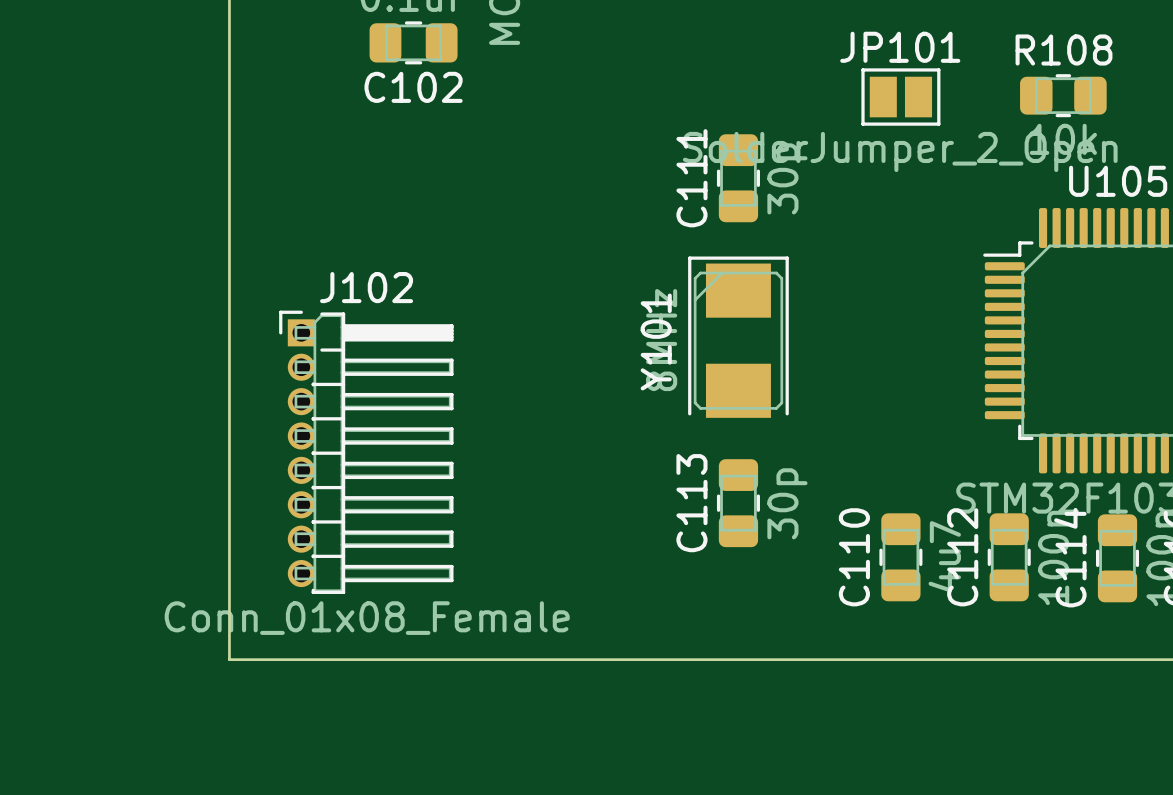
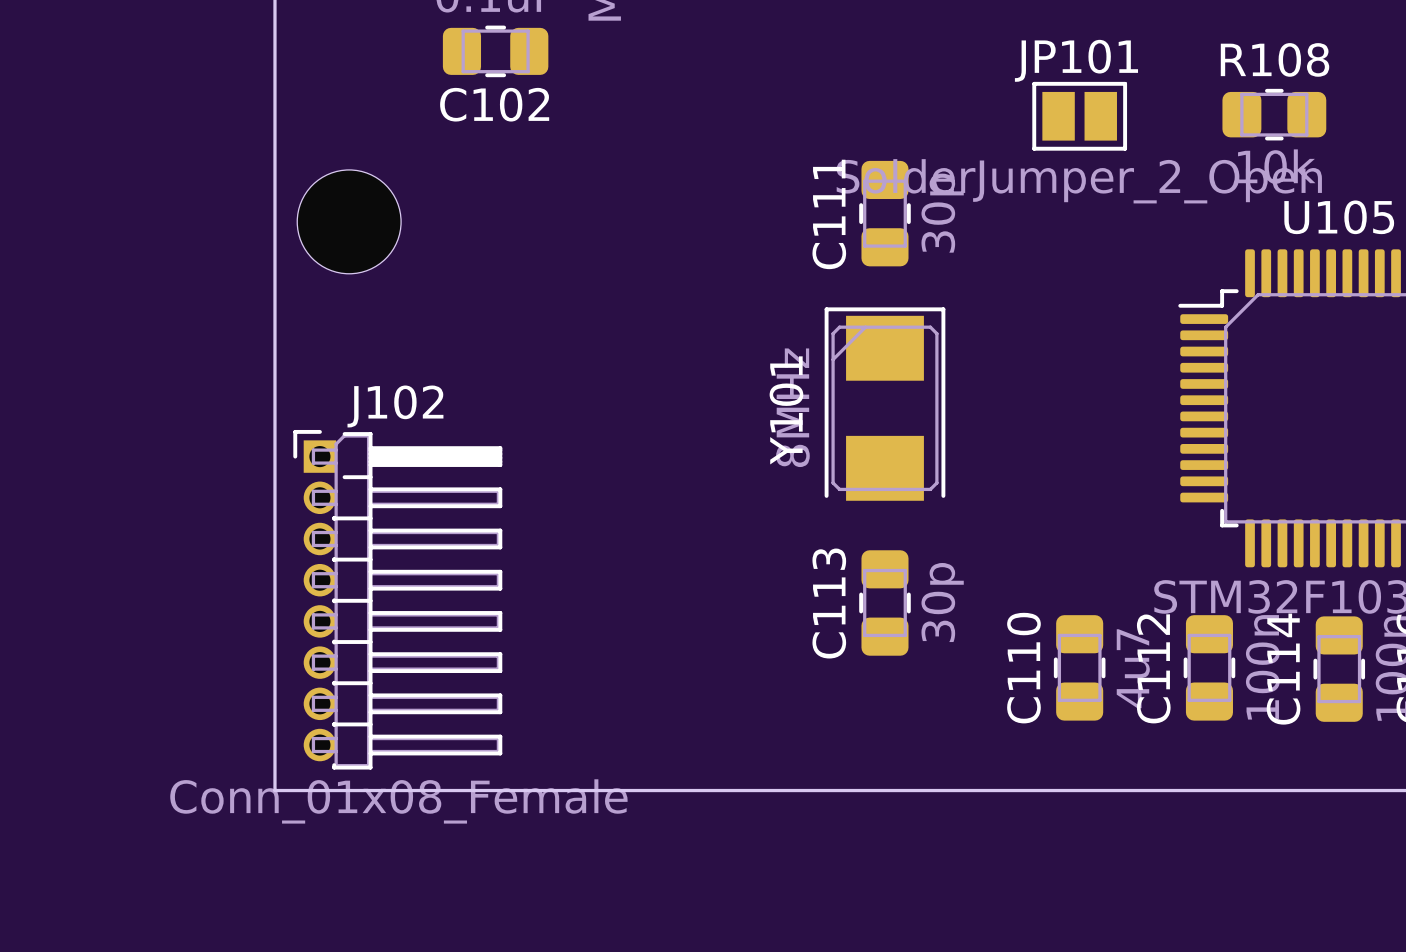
part: none -> (349, 221)
J102 position: (366, 452) -> (397, 599)

